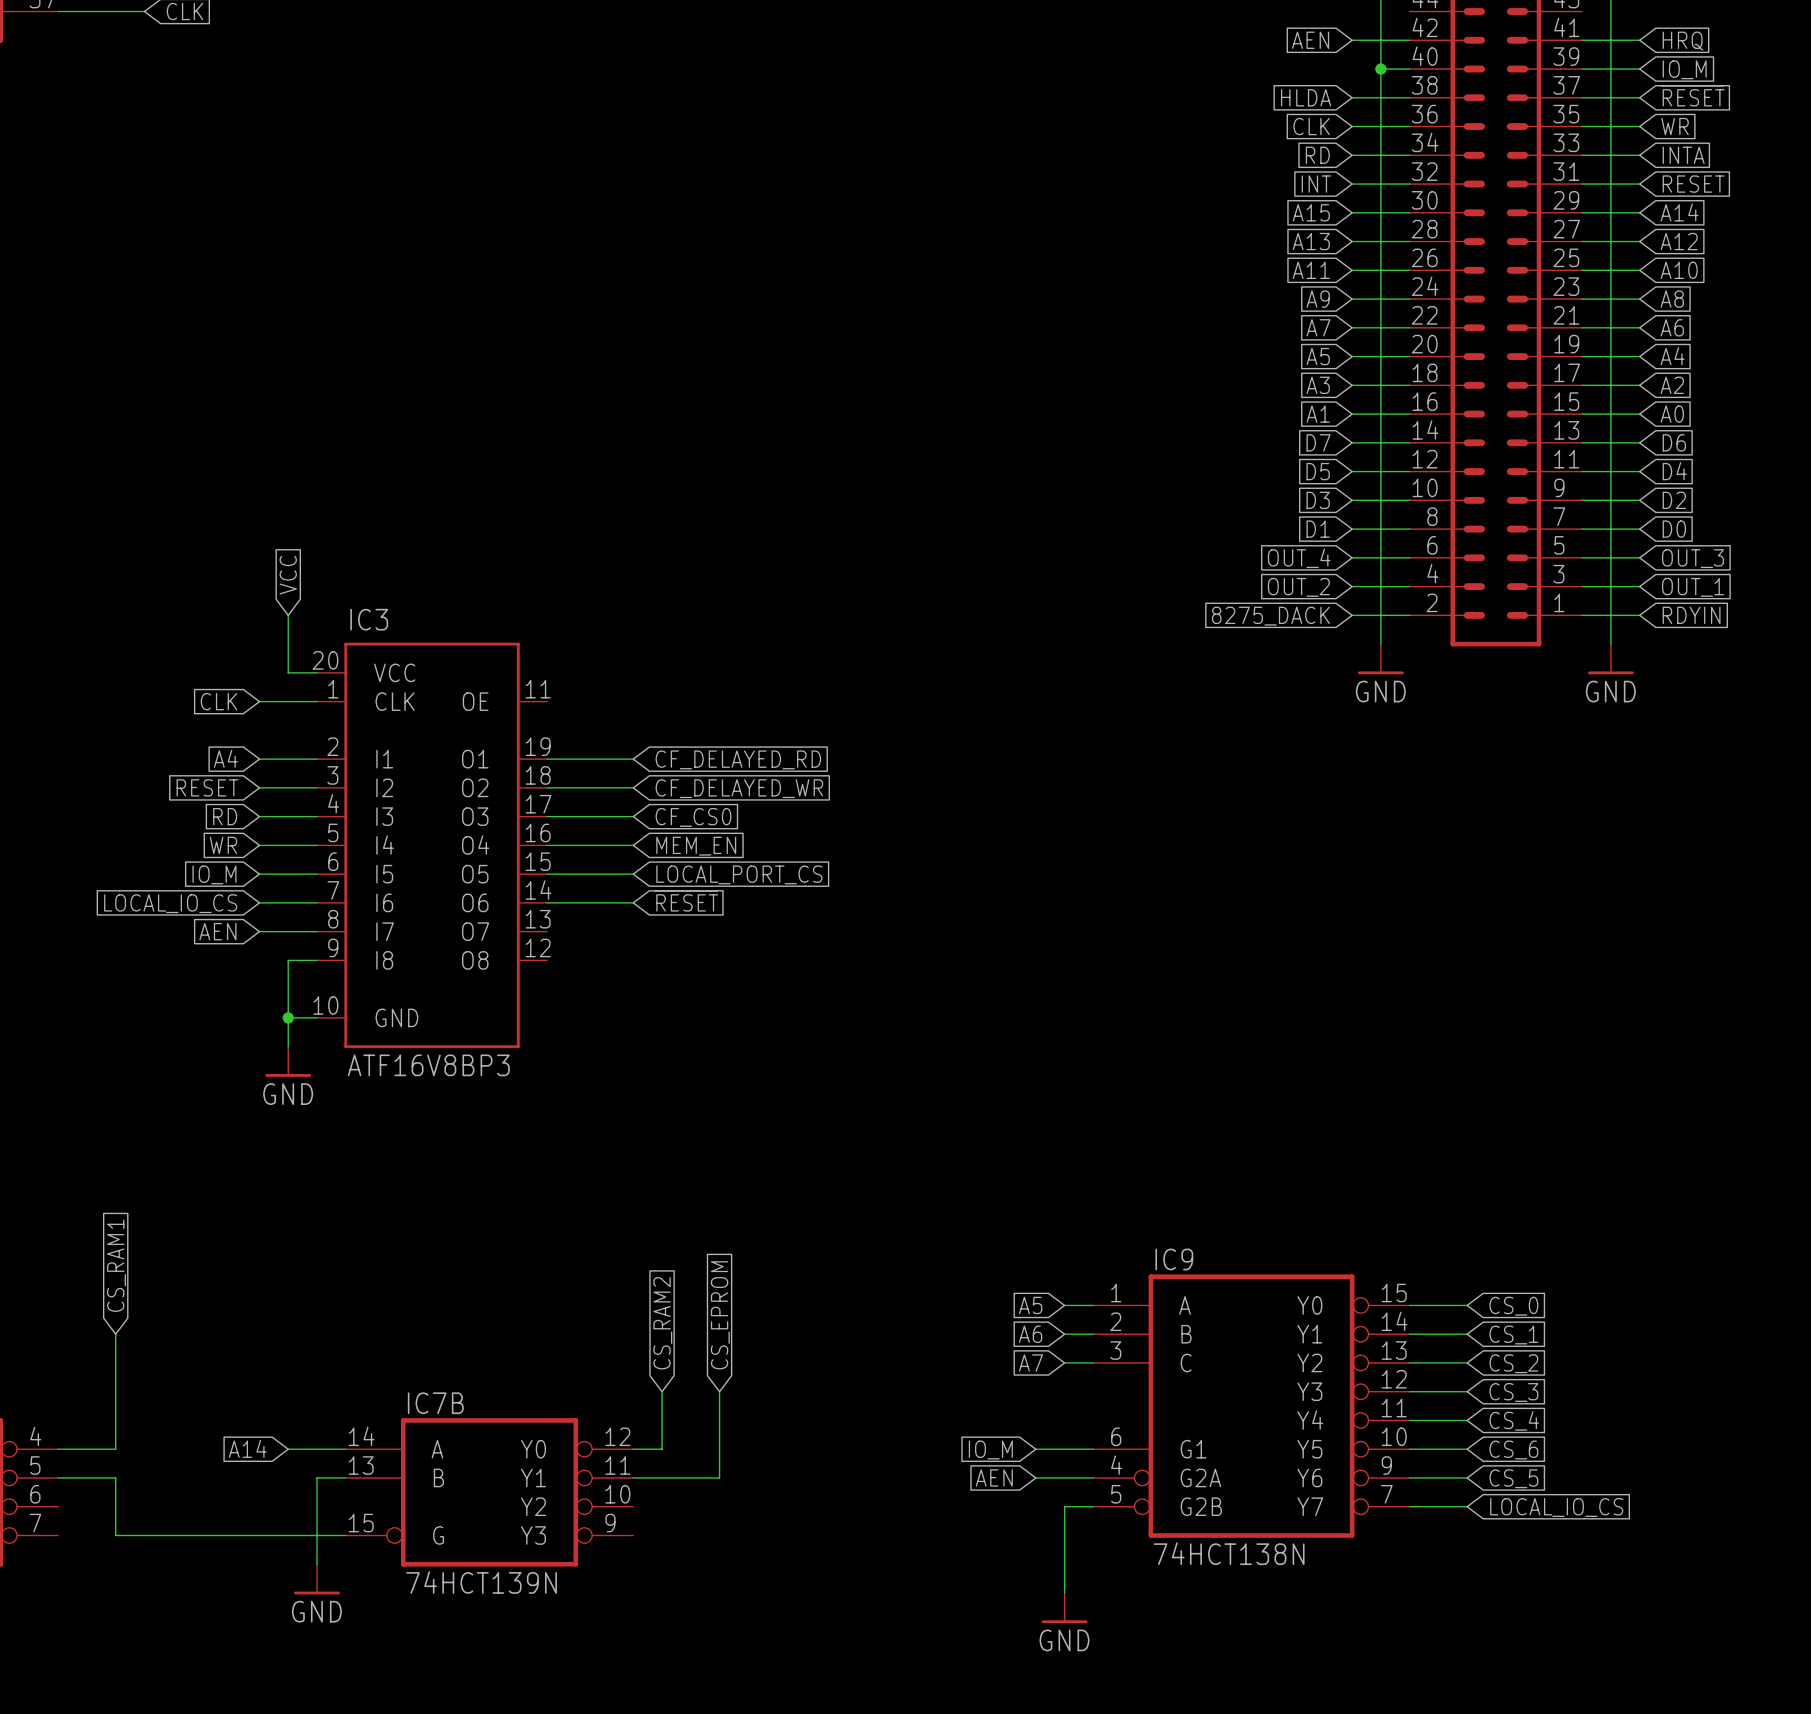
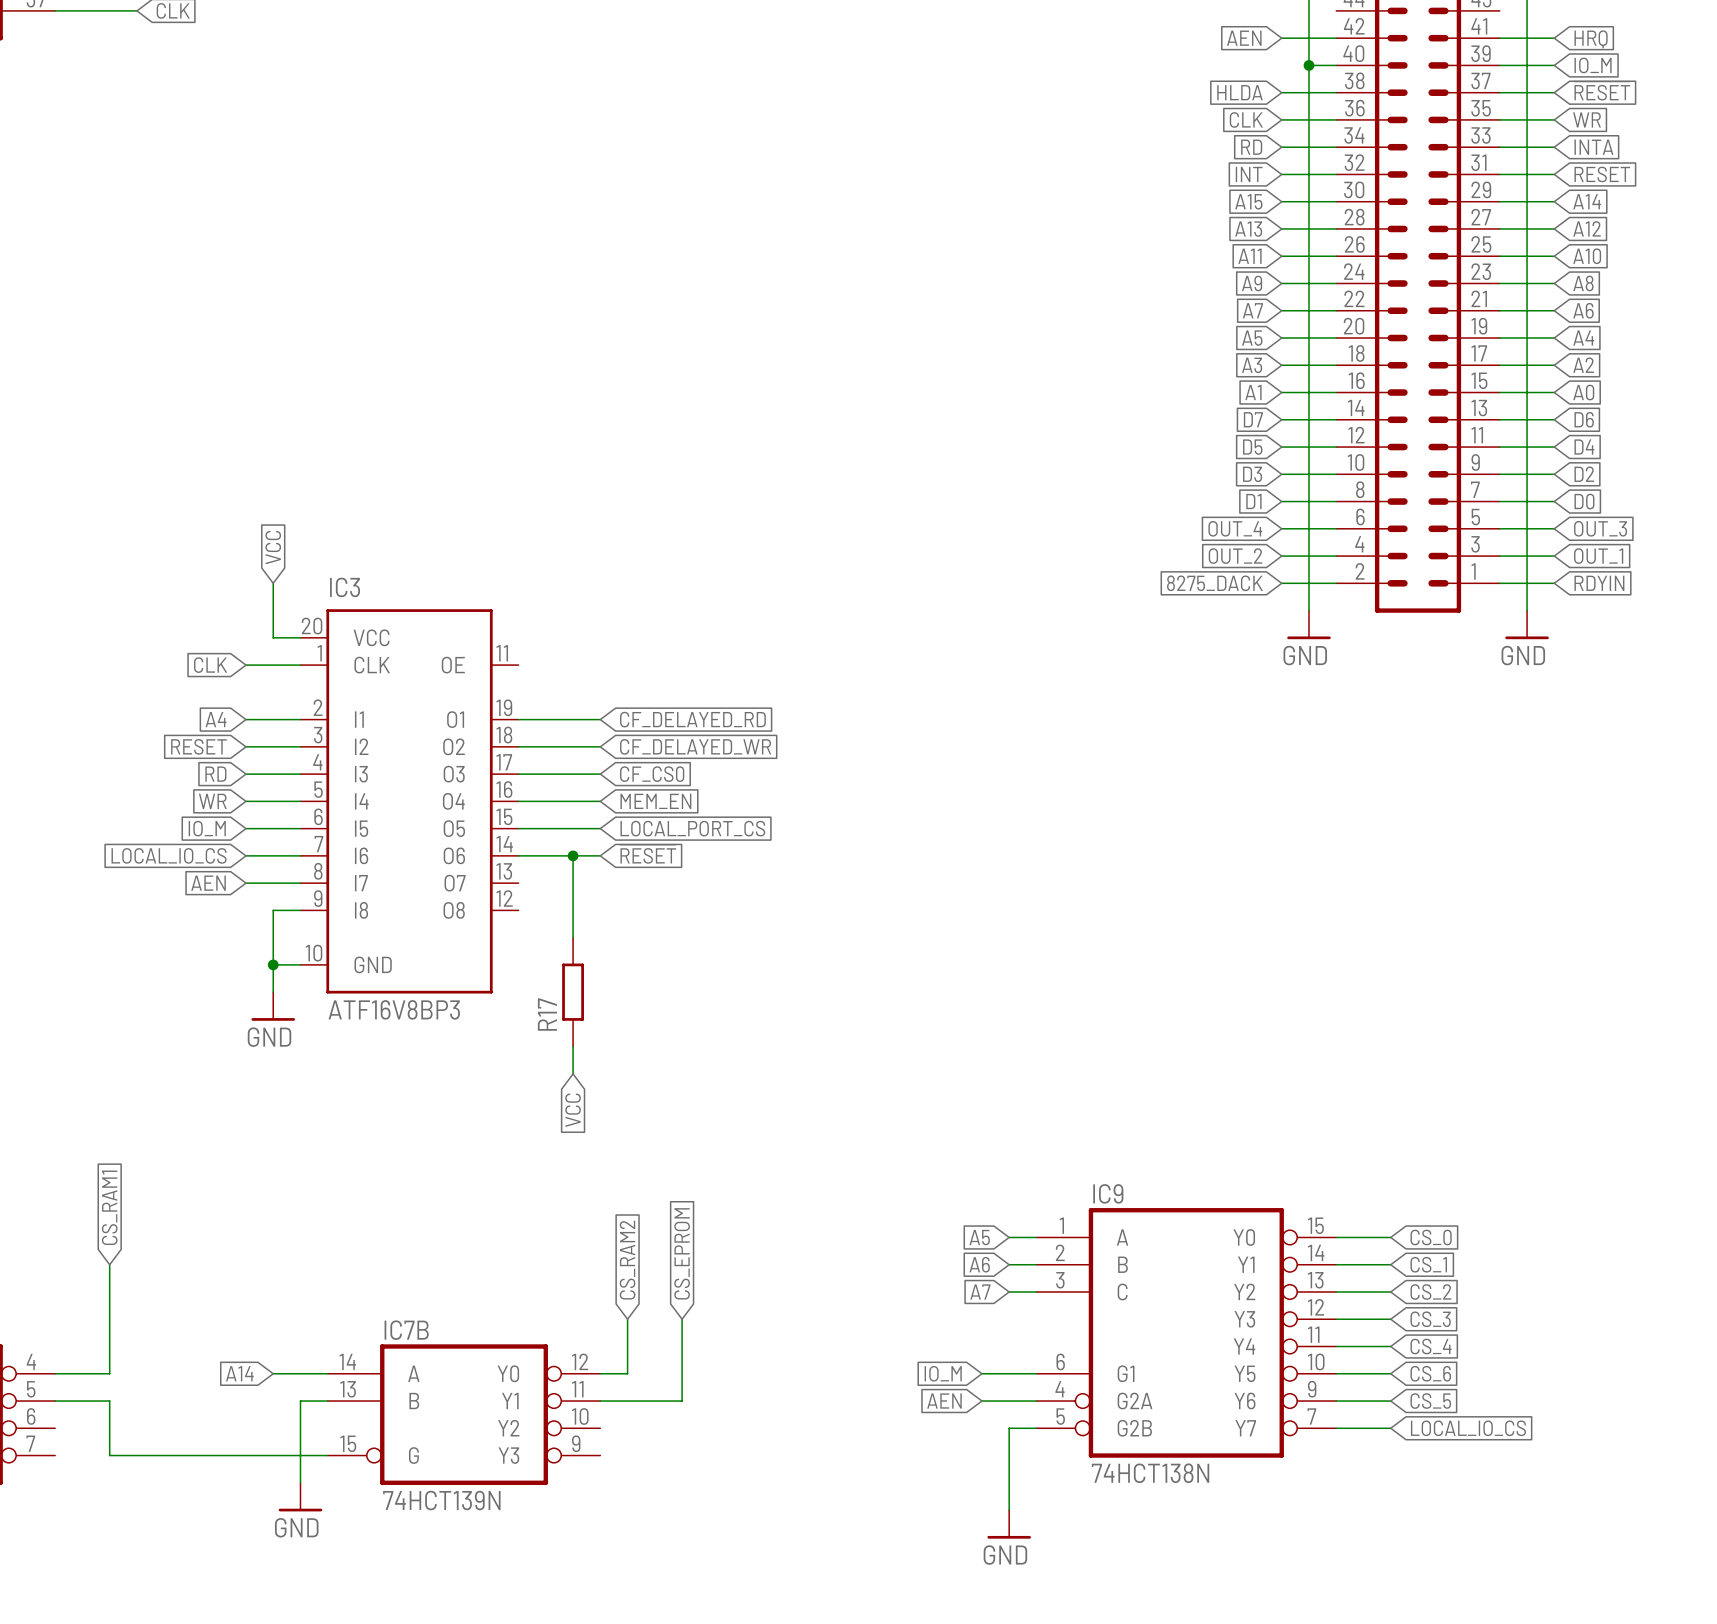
wire: none -> (573, 855) (573, 937)
junction: none -> (573, 855)
R17: none -> (573, 992)
wire: none -> (573, 1046) (573, 1073)
global label: none -> VCC (573, 1110)

